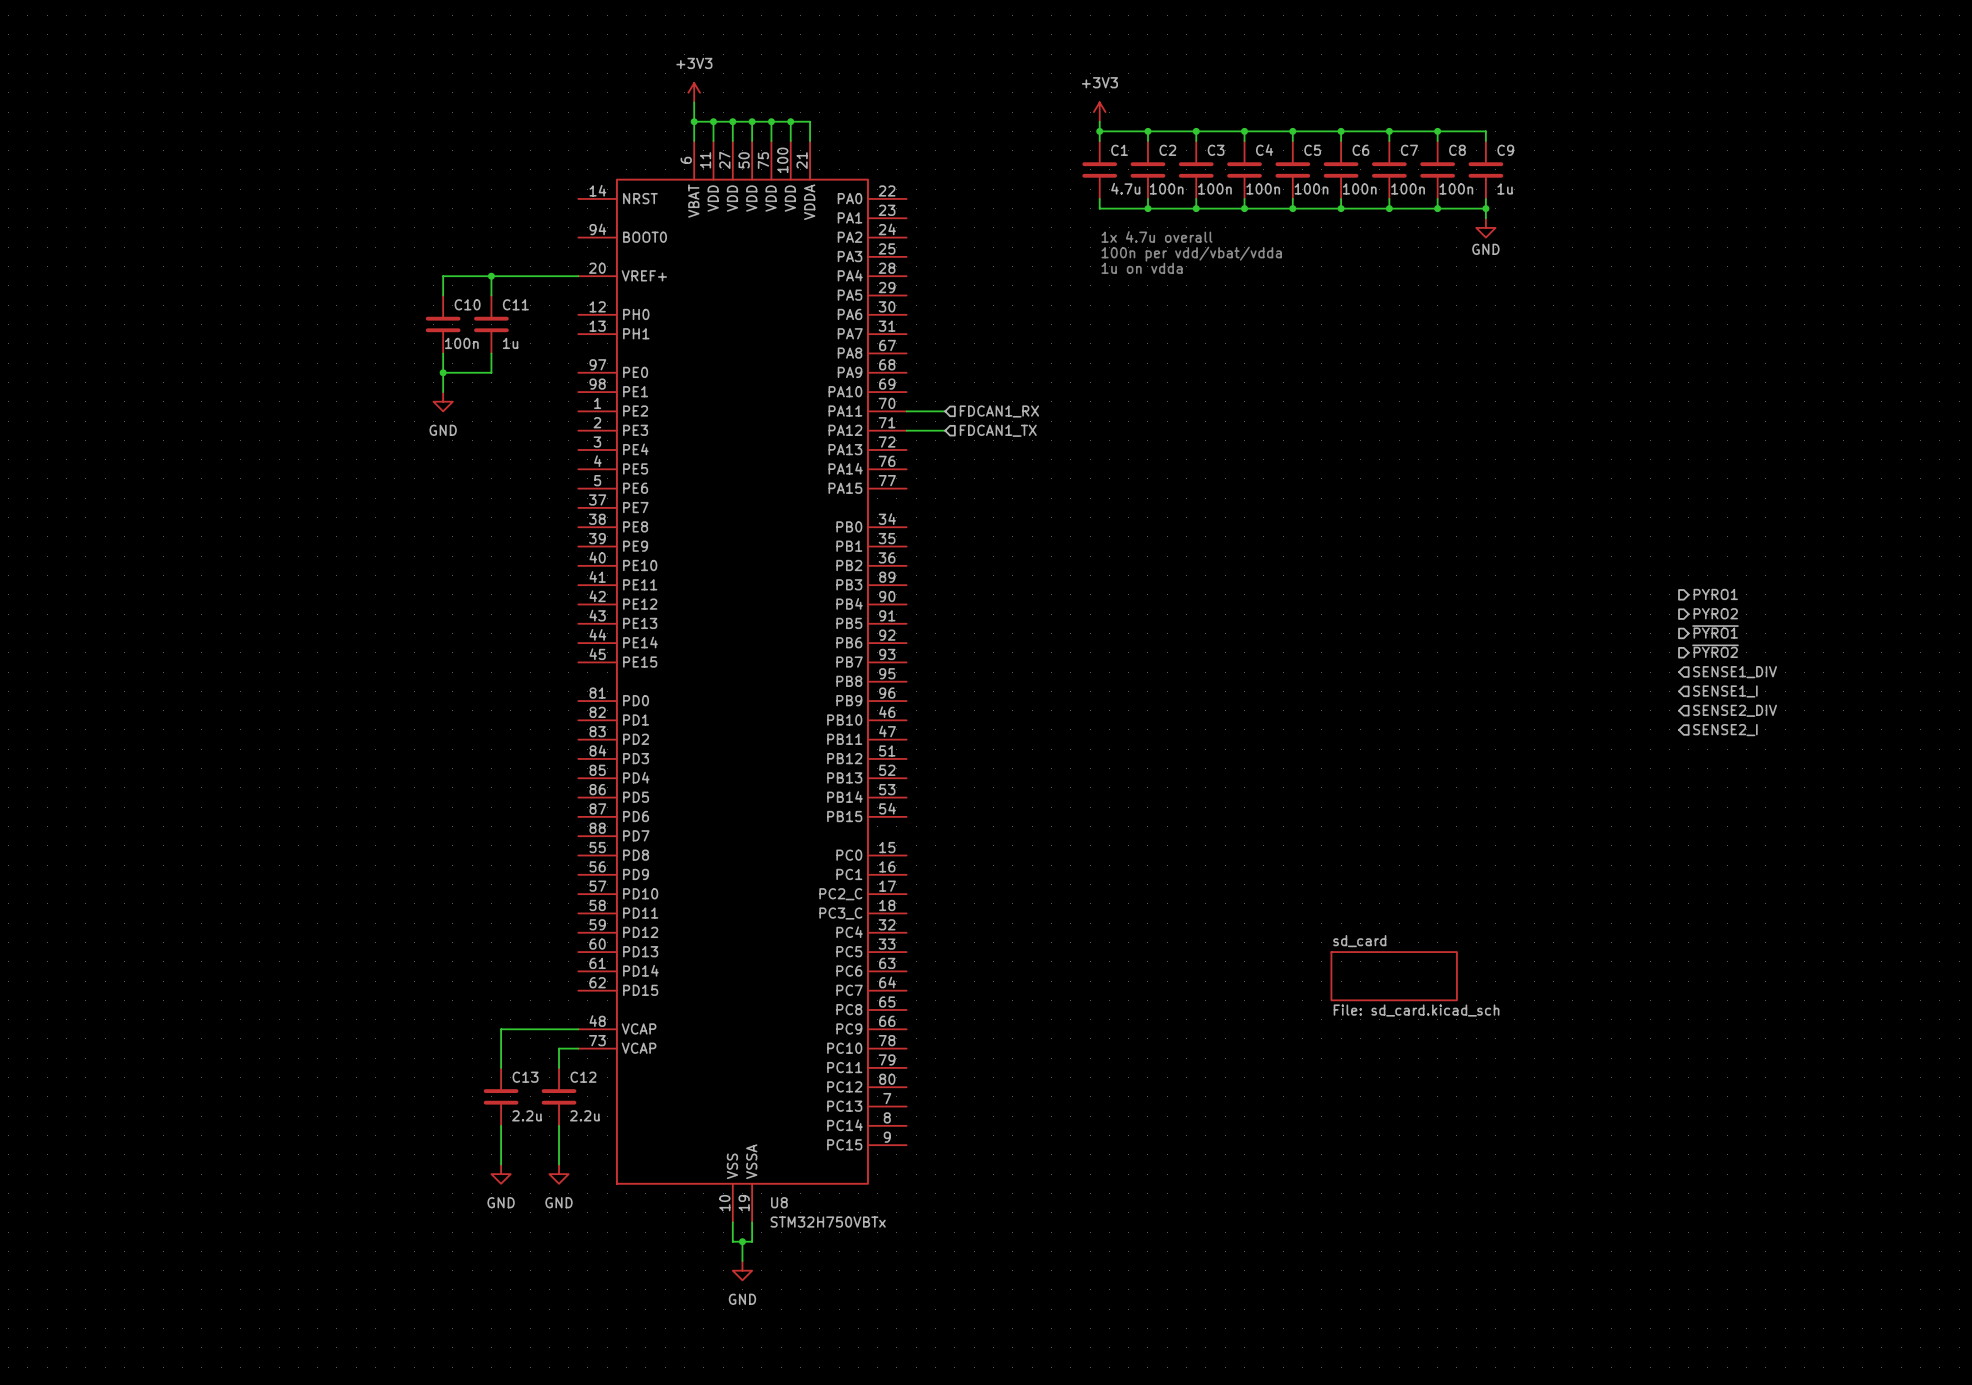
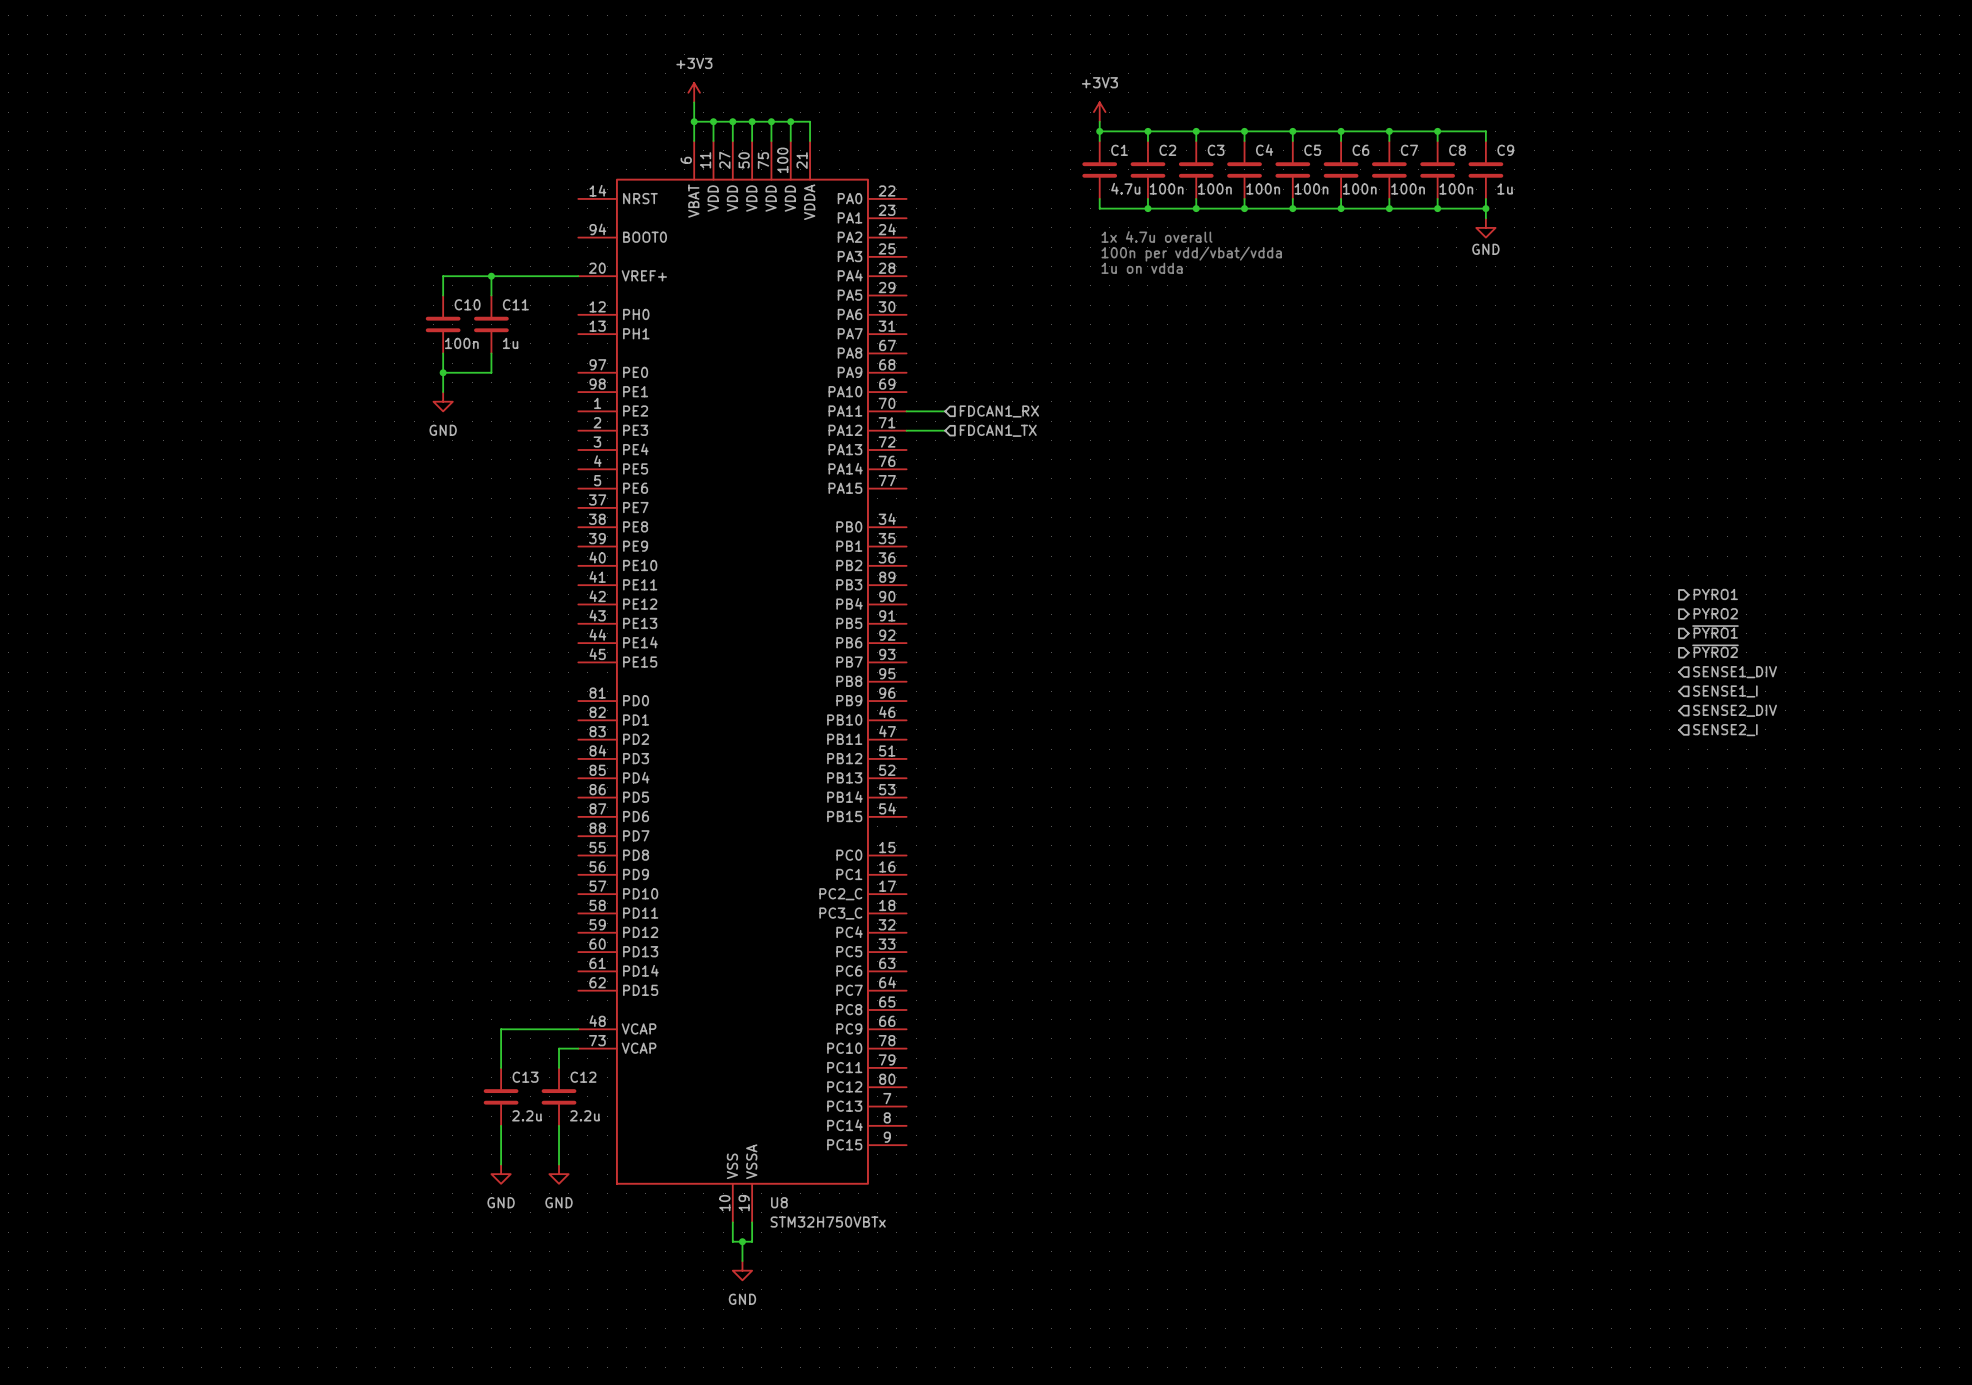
sheet sd_card: File: sd_card.kicad_sch (1394, 976) -> none

